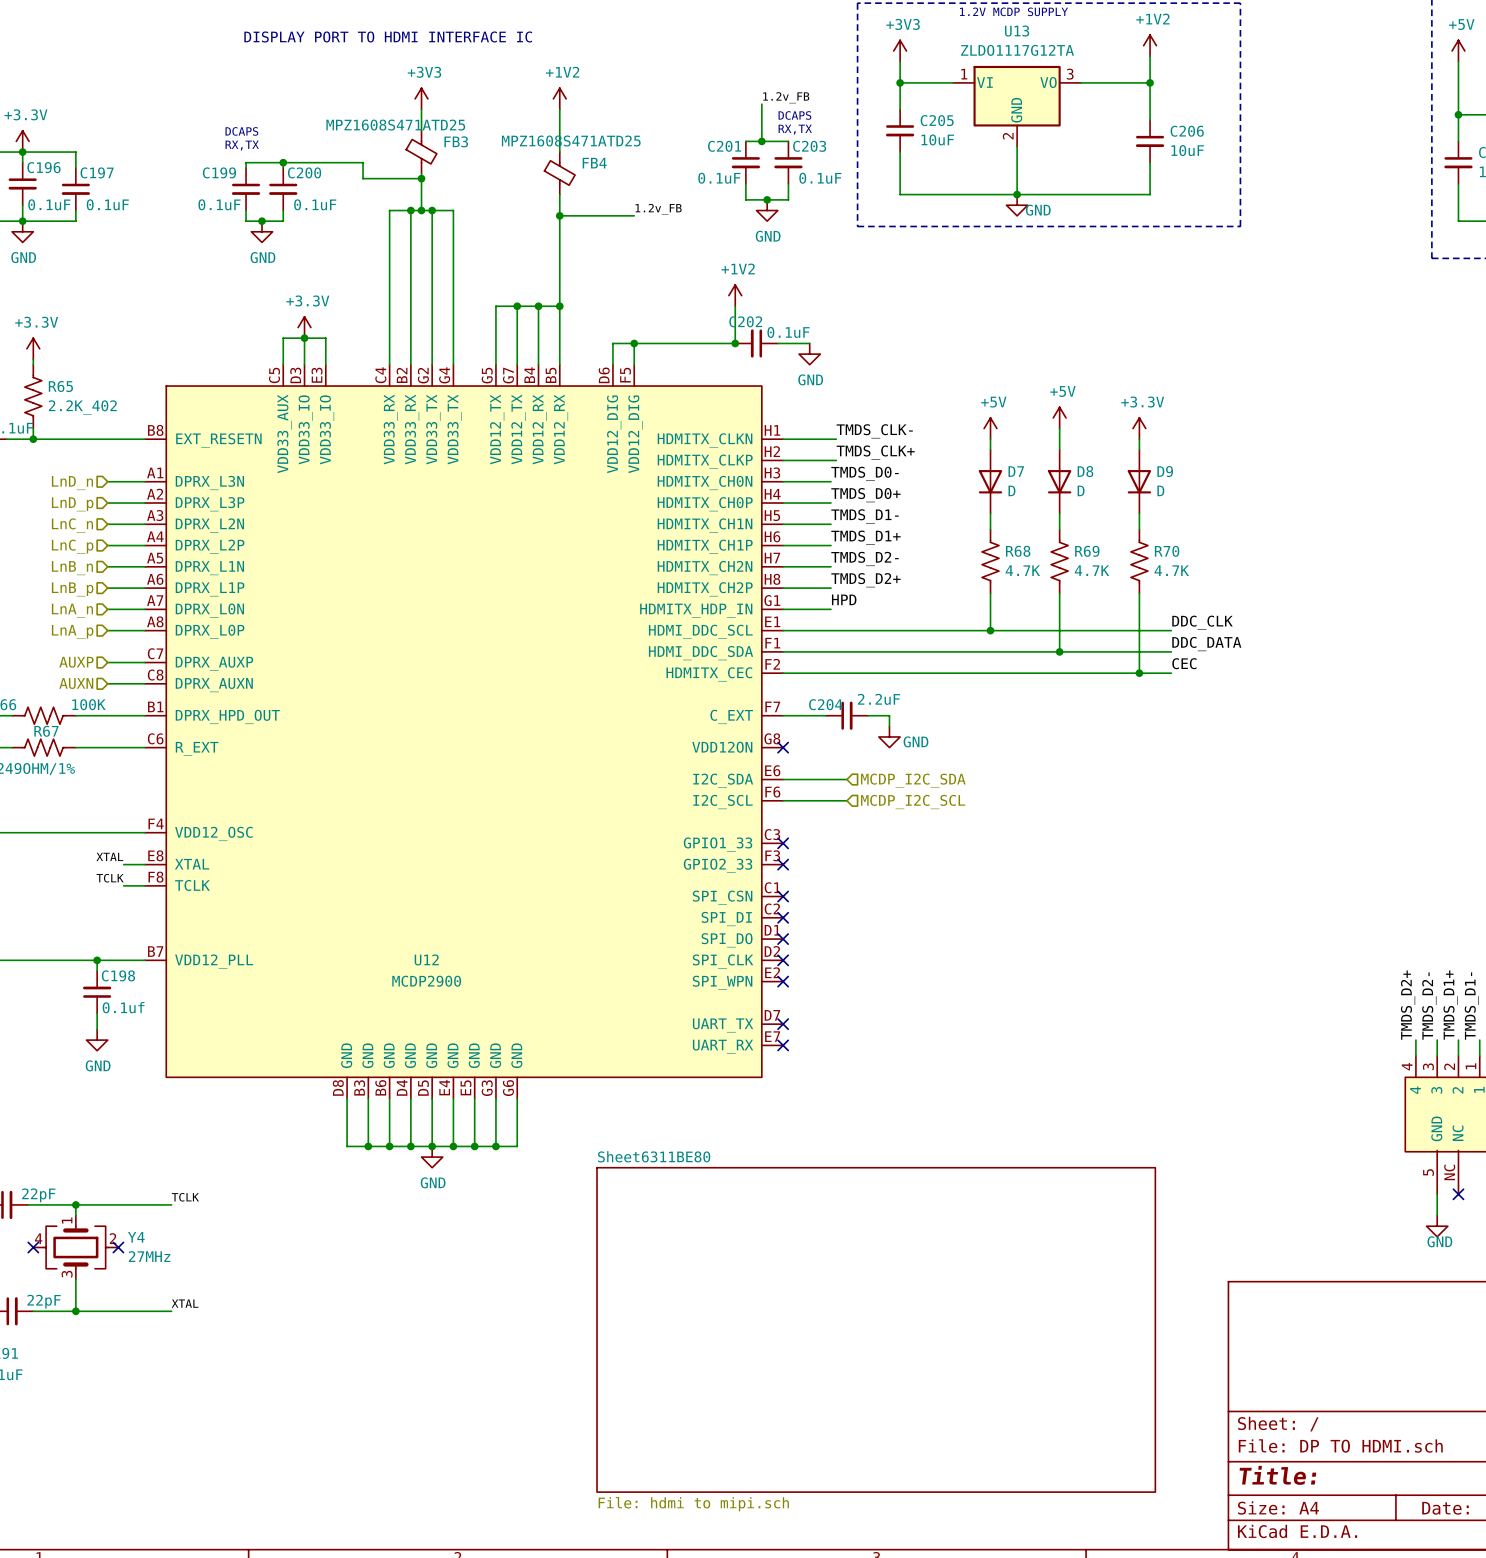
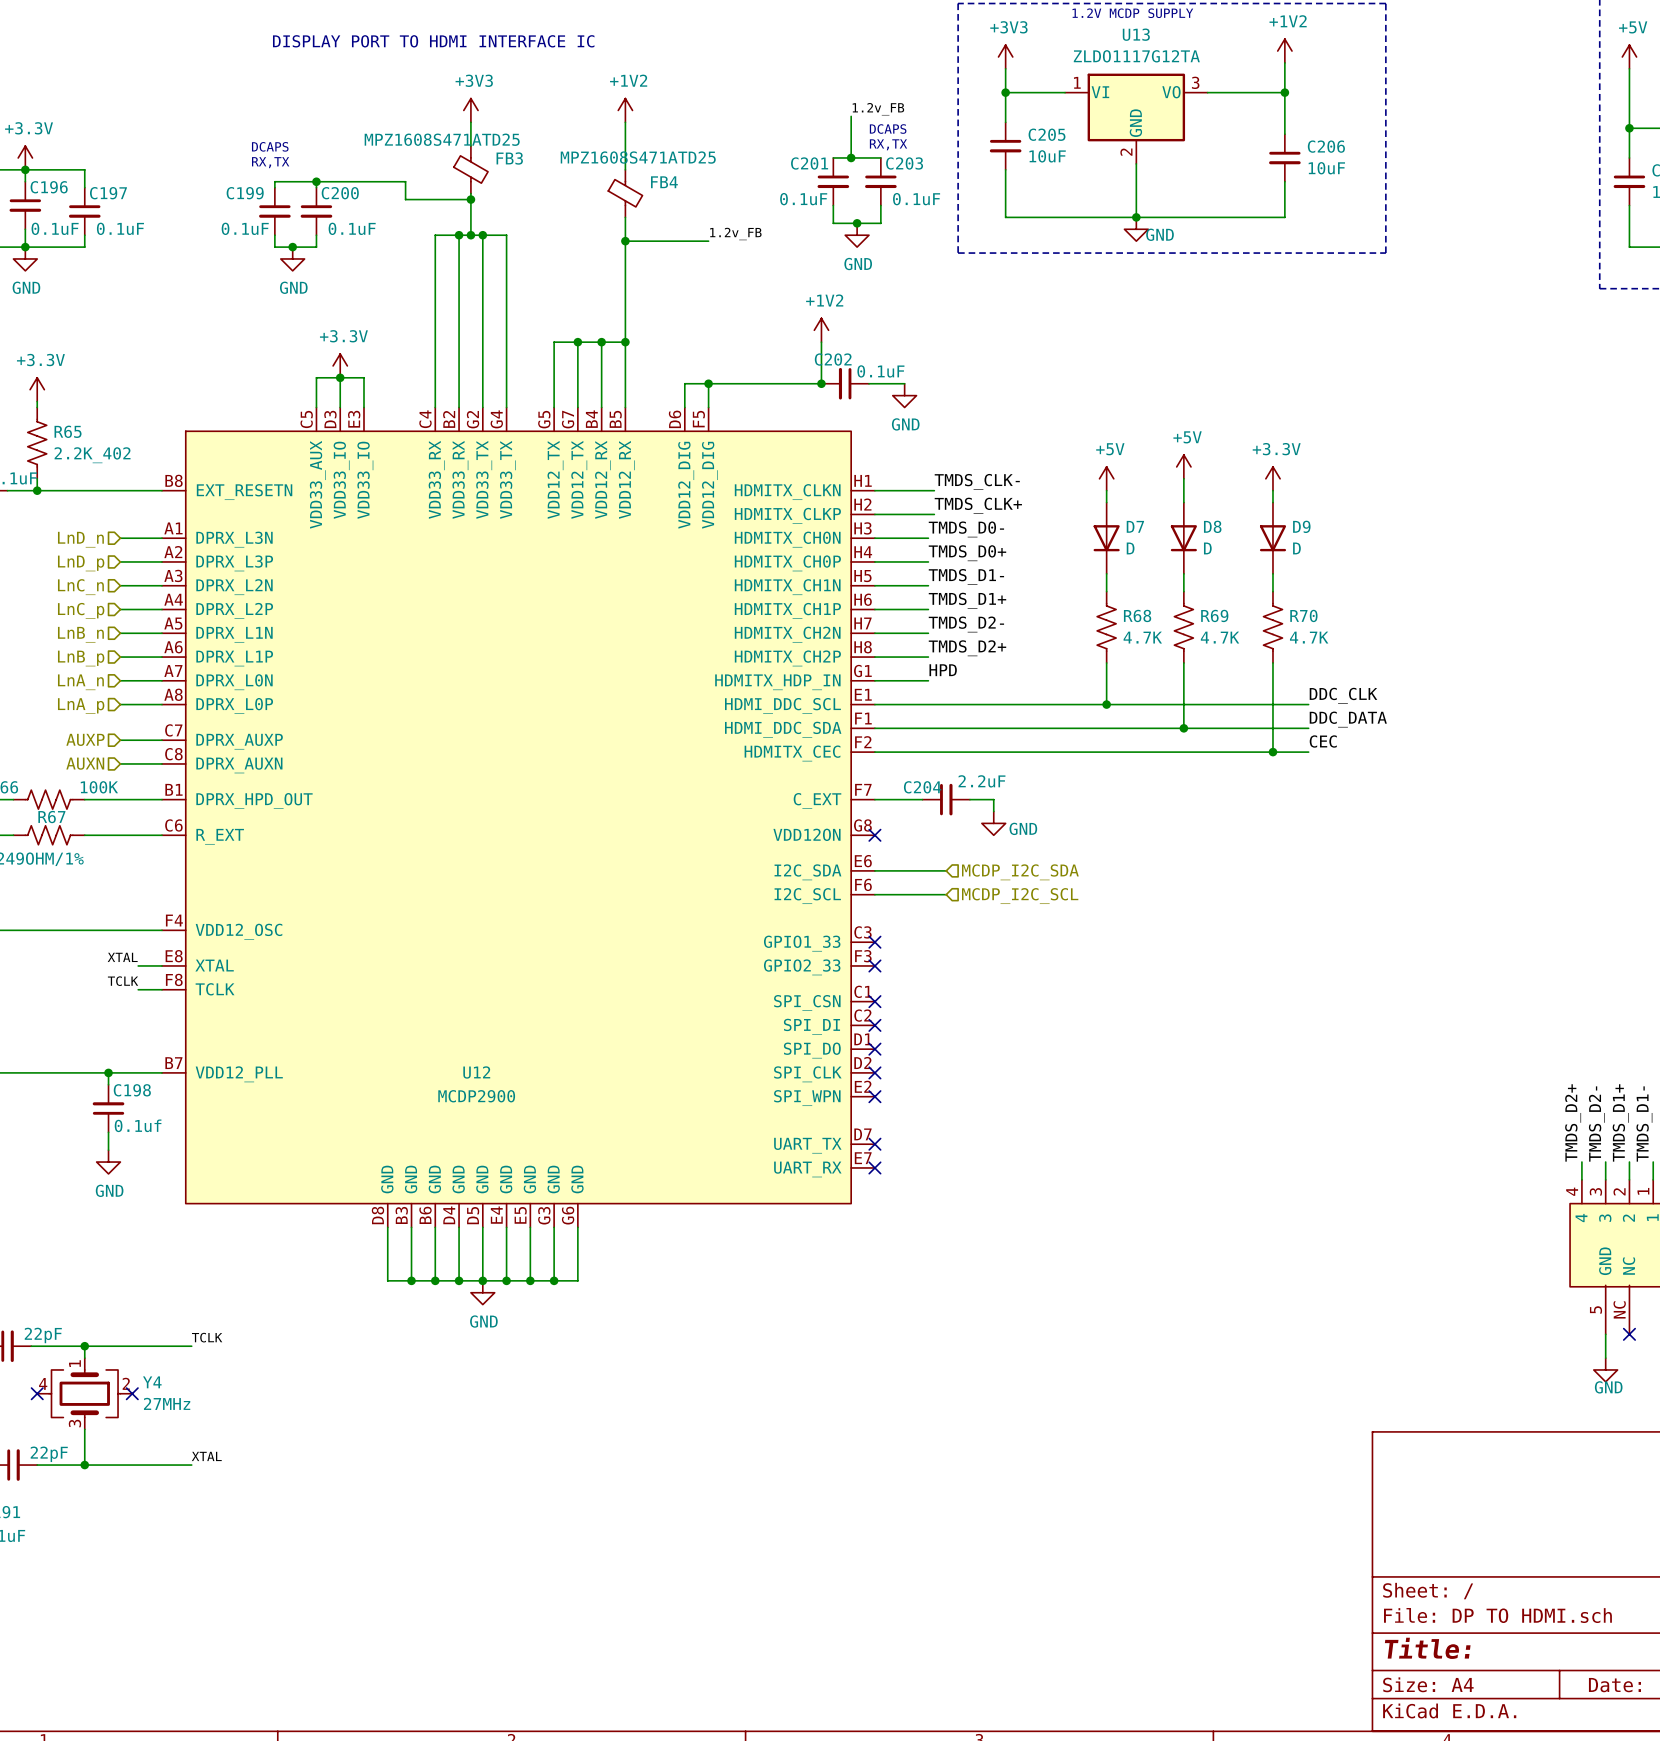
sheet Sheet6311BE80: File: hdmi to mipi.sch (876, 1329) -> none

